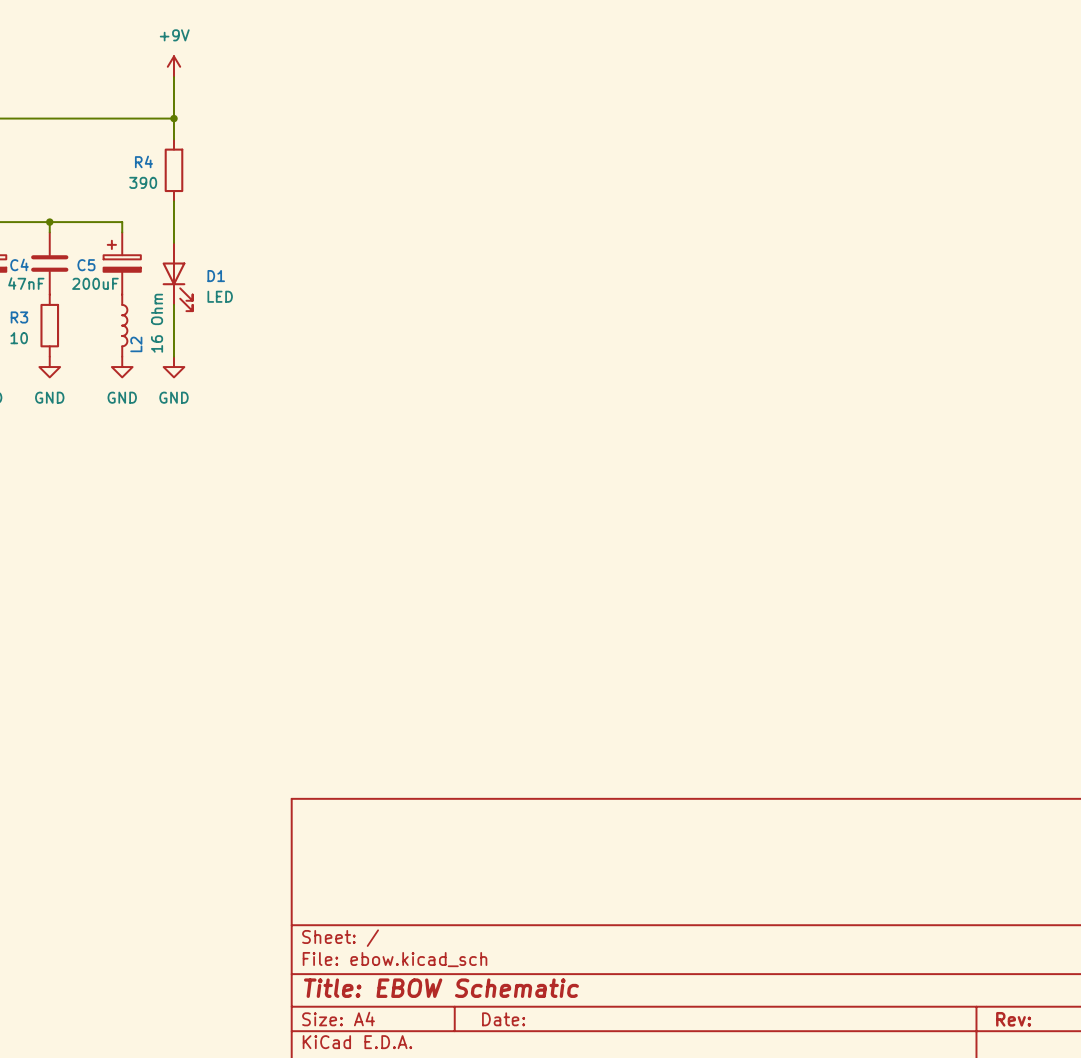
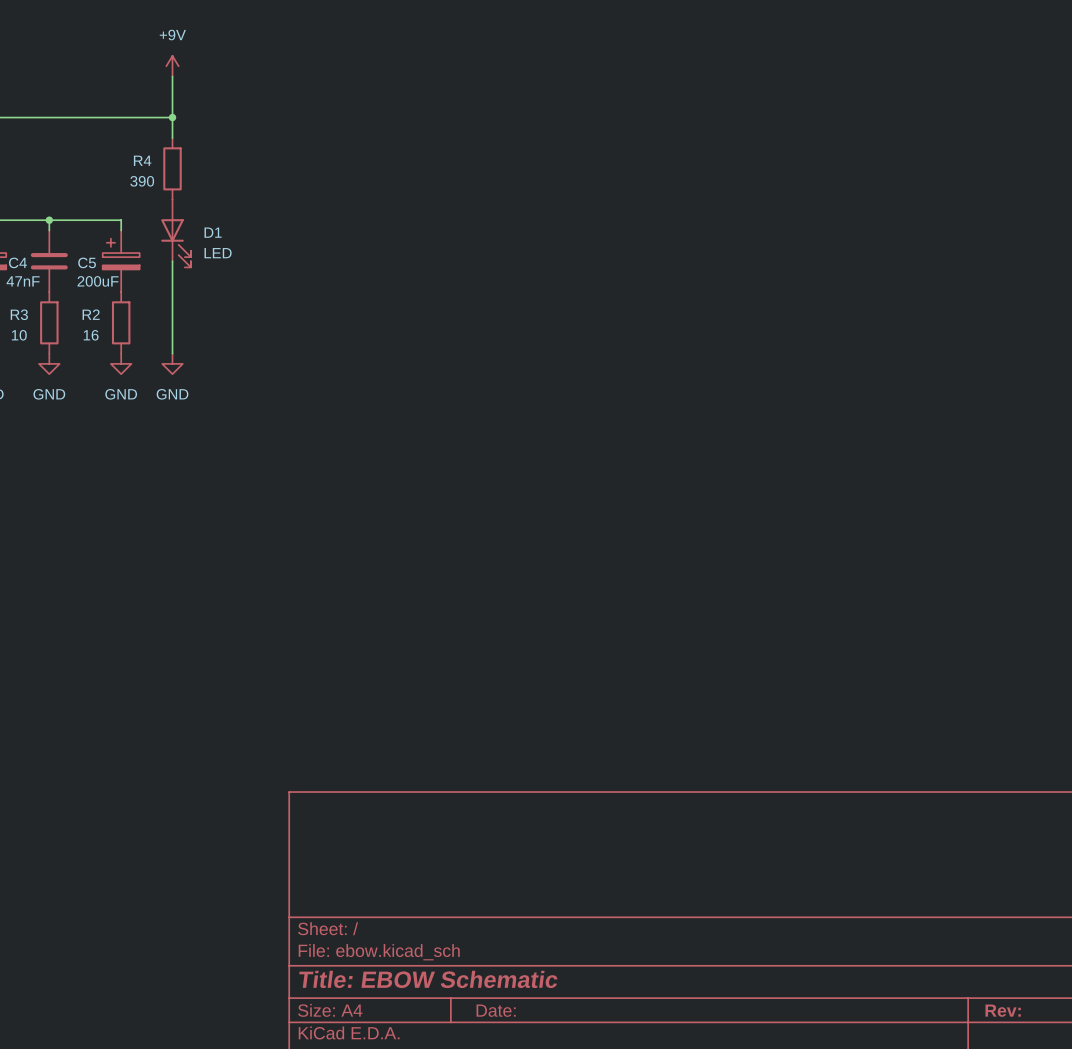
D1 position: (177, 276) -> (176, 233)
R2: none -> 16 (121, 322)
L2: 16 Ohm (124, 325) -> none

